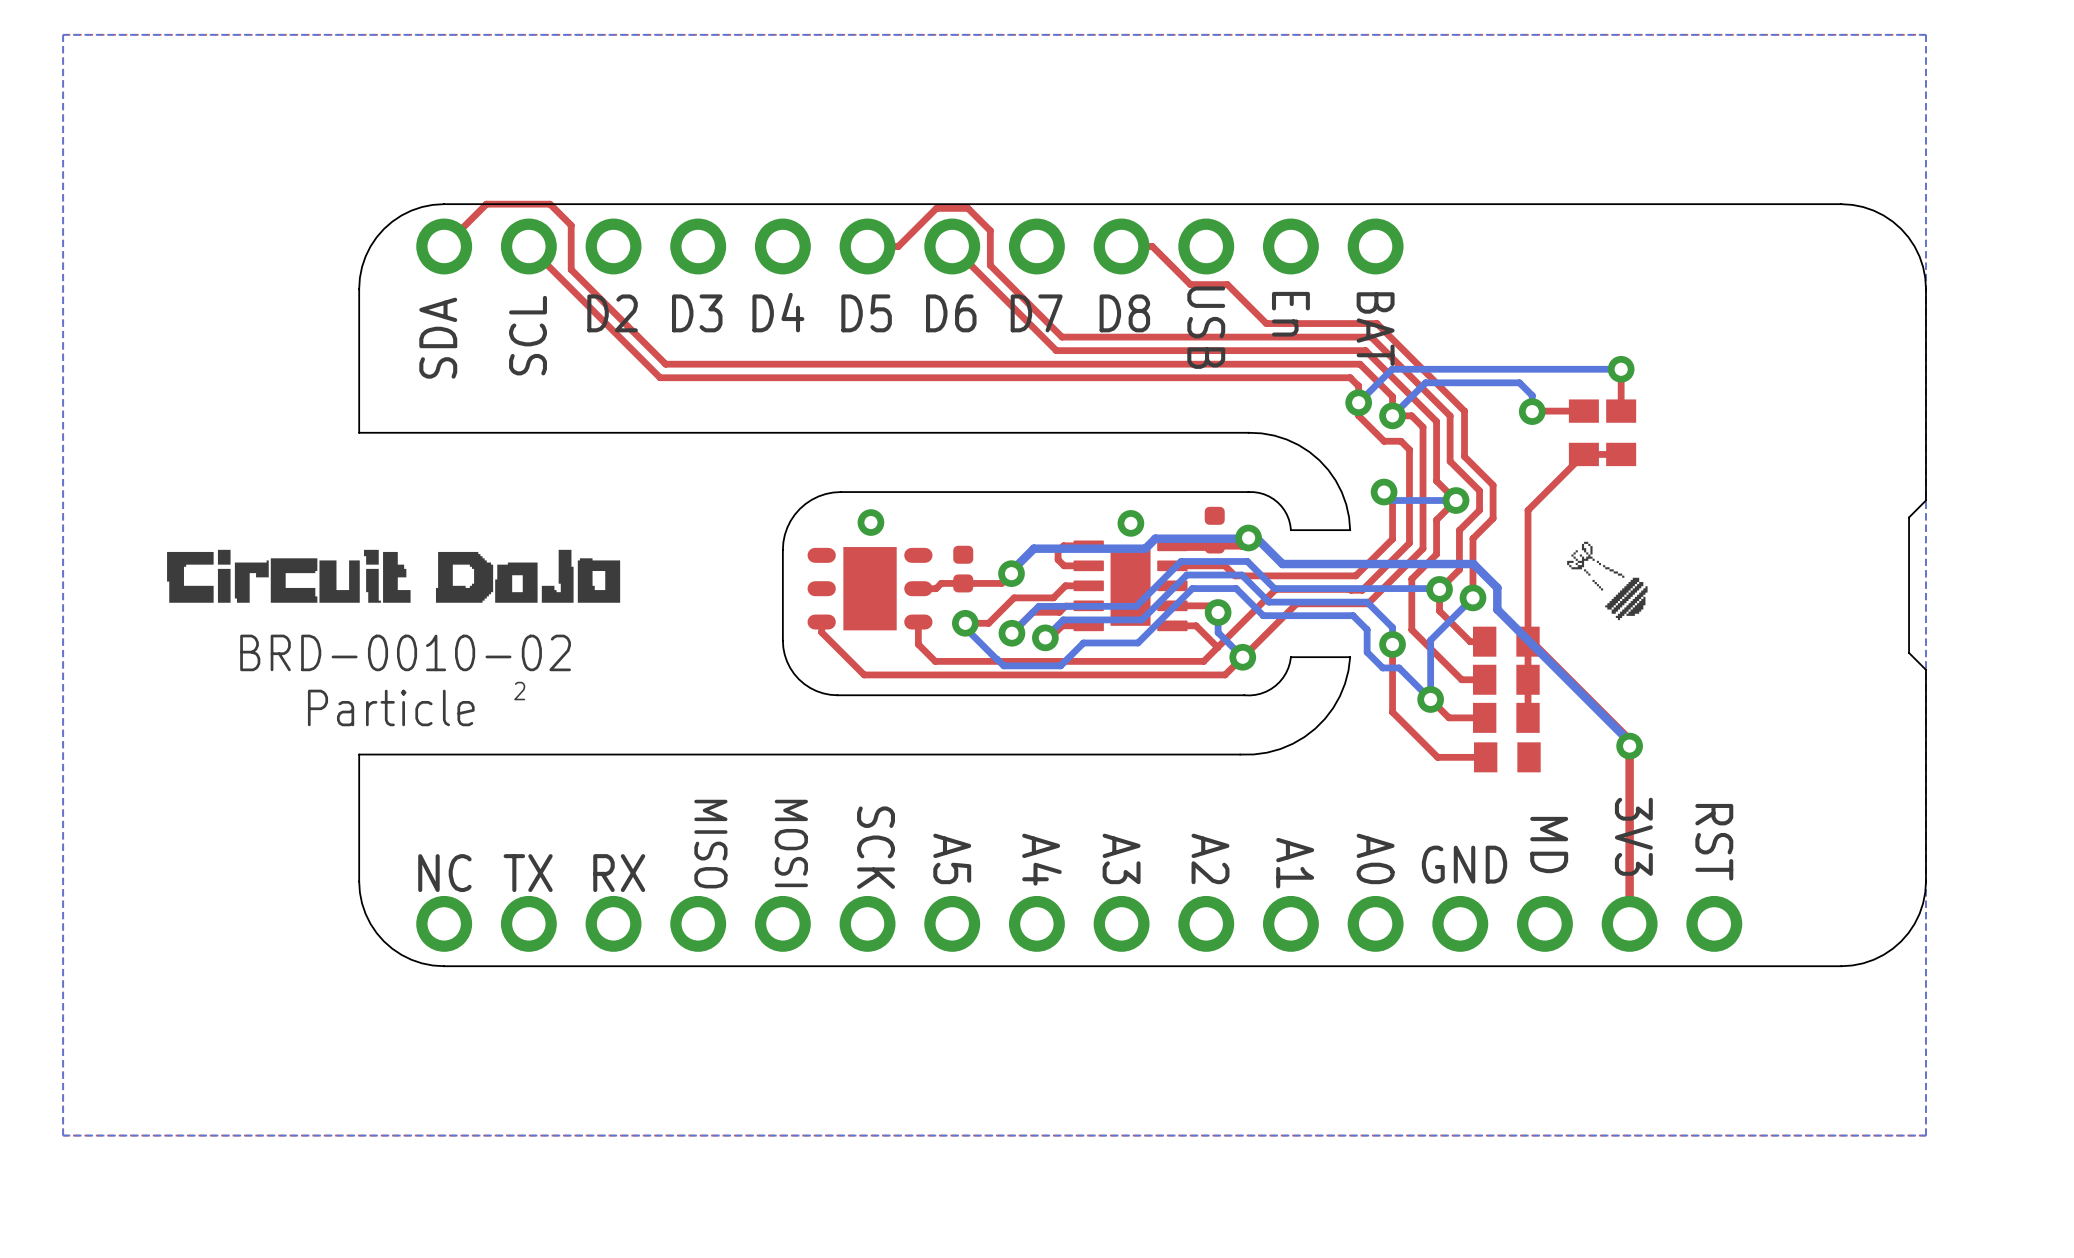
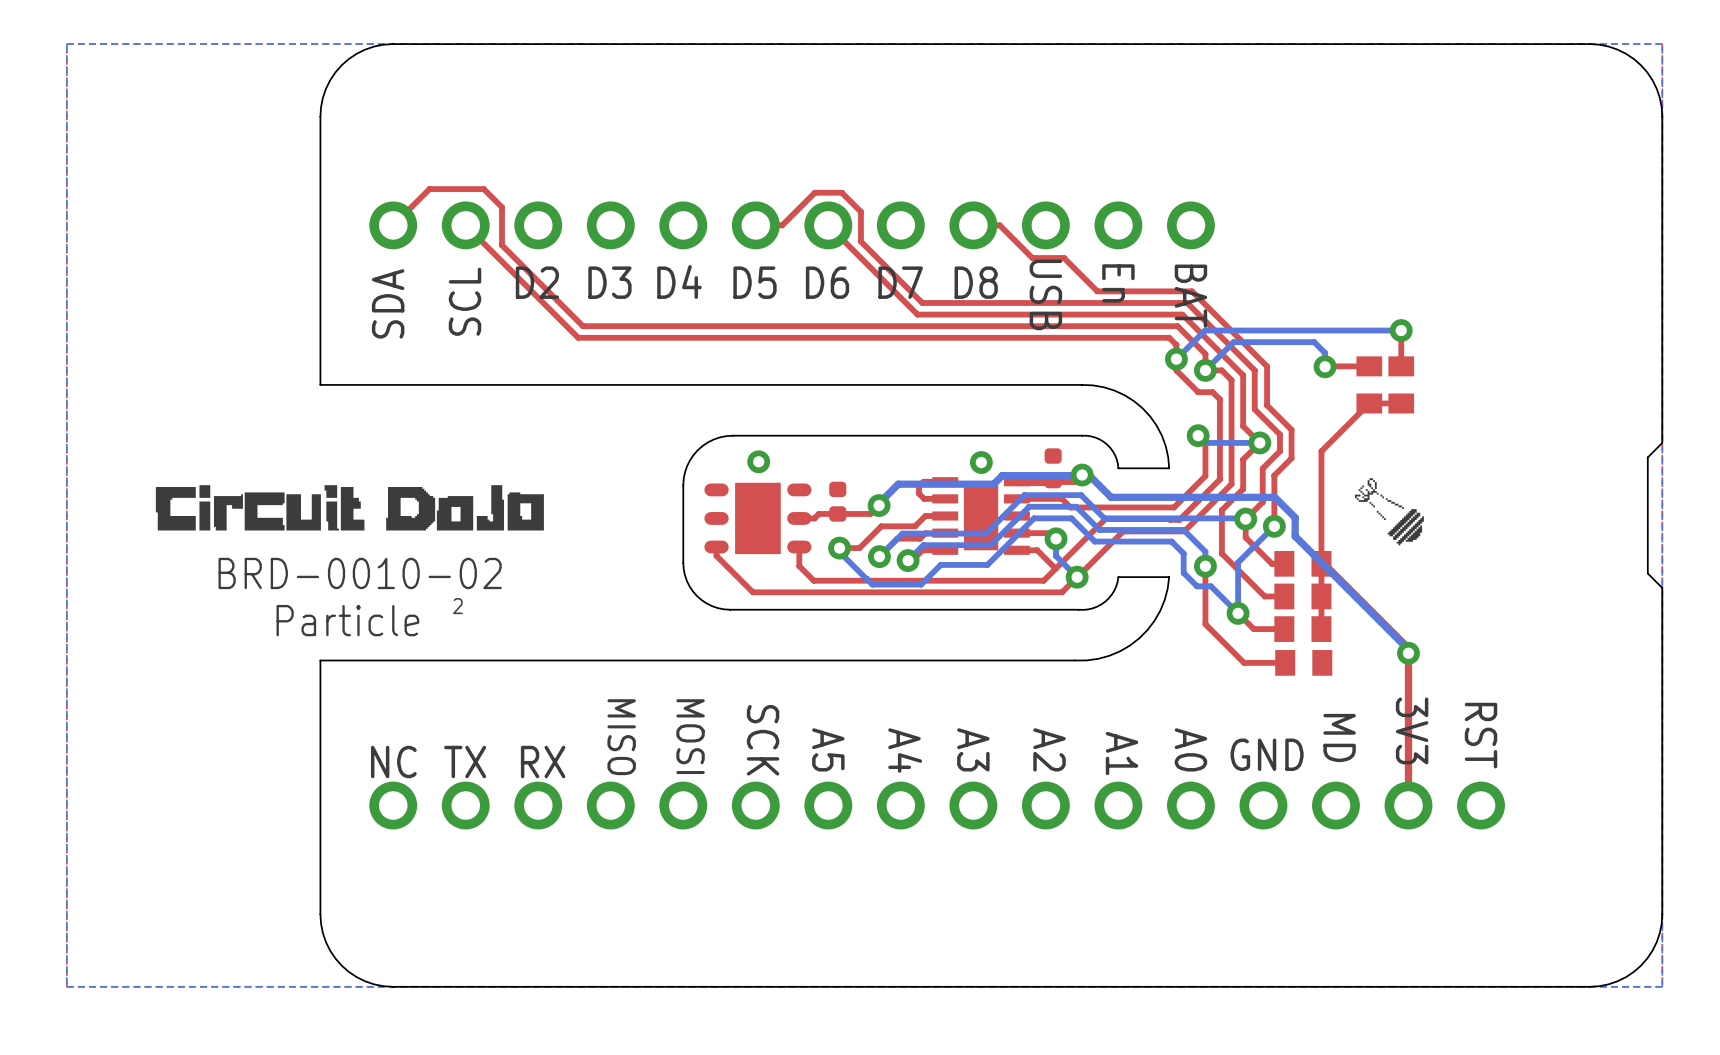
board edge: (1925, 288) (1919, 256) (1901, 228) (1873, 210) (1841, 204) (443, 204) (411, 210) (383, 228) (365, 256) (359, 288) -> (1662, 261) (1662, 116) (1659, 97) (1647, 72) (1633, 59) (1608, 46) (1589, 44) (383, 44) (365, 49) (341, 65) (330, 80) (322, 97) (320, 116) (320, 261)
board edge: (1925, 881) (1919, 913) (1901, 941) (1873, 959) (1841, 966) (443, 966) (411, 959) (383, 941) (365, 913) (359, 881) -> (1662, 769) (1662, 914) (1659, 933) (1647, 958) (1633, 971) (1608, 984) (1589, 986) (383, 986) (365, 981) (341, 965) (330, 950) (322, 933) (320, 914) (320, 769)

